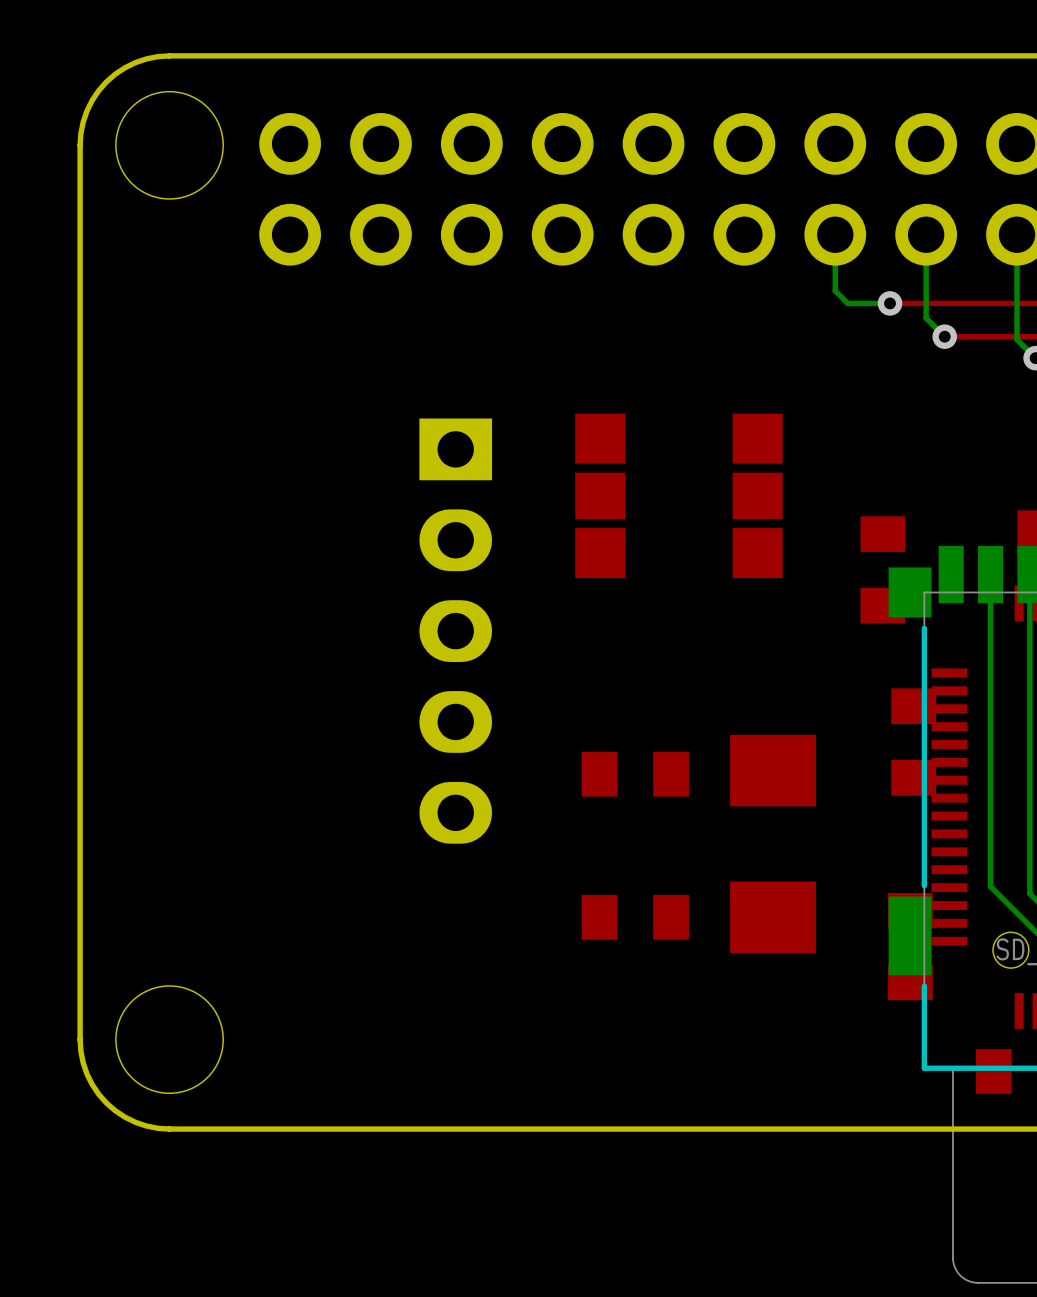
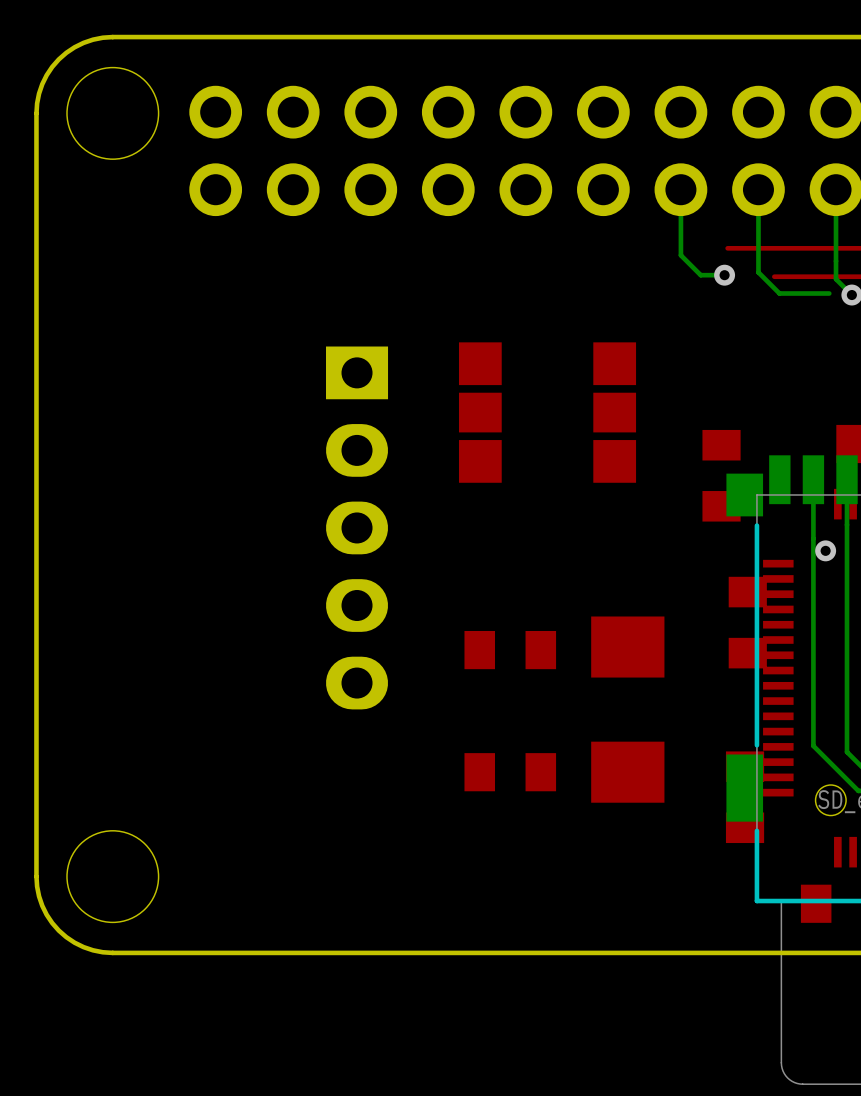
bottom track: (835, 290) (847, 303) (890, 303) -> (680, 237) (680, 255) (700, 275) (724, 275)
via: (890, 303) -> none
bottom track: (926, 318) (944, 336) -> (758, 260) (758, 272) (779, 293) (829, 293)
via: none -> (724, 275)
via: (944, 336) -> none
via: none -> (825, 550)

